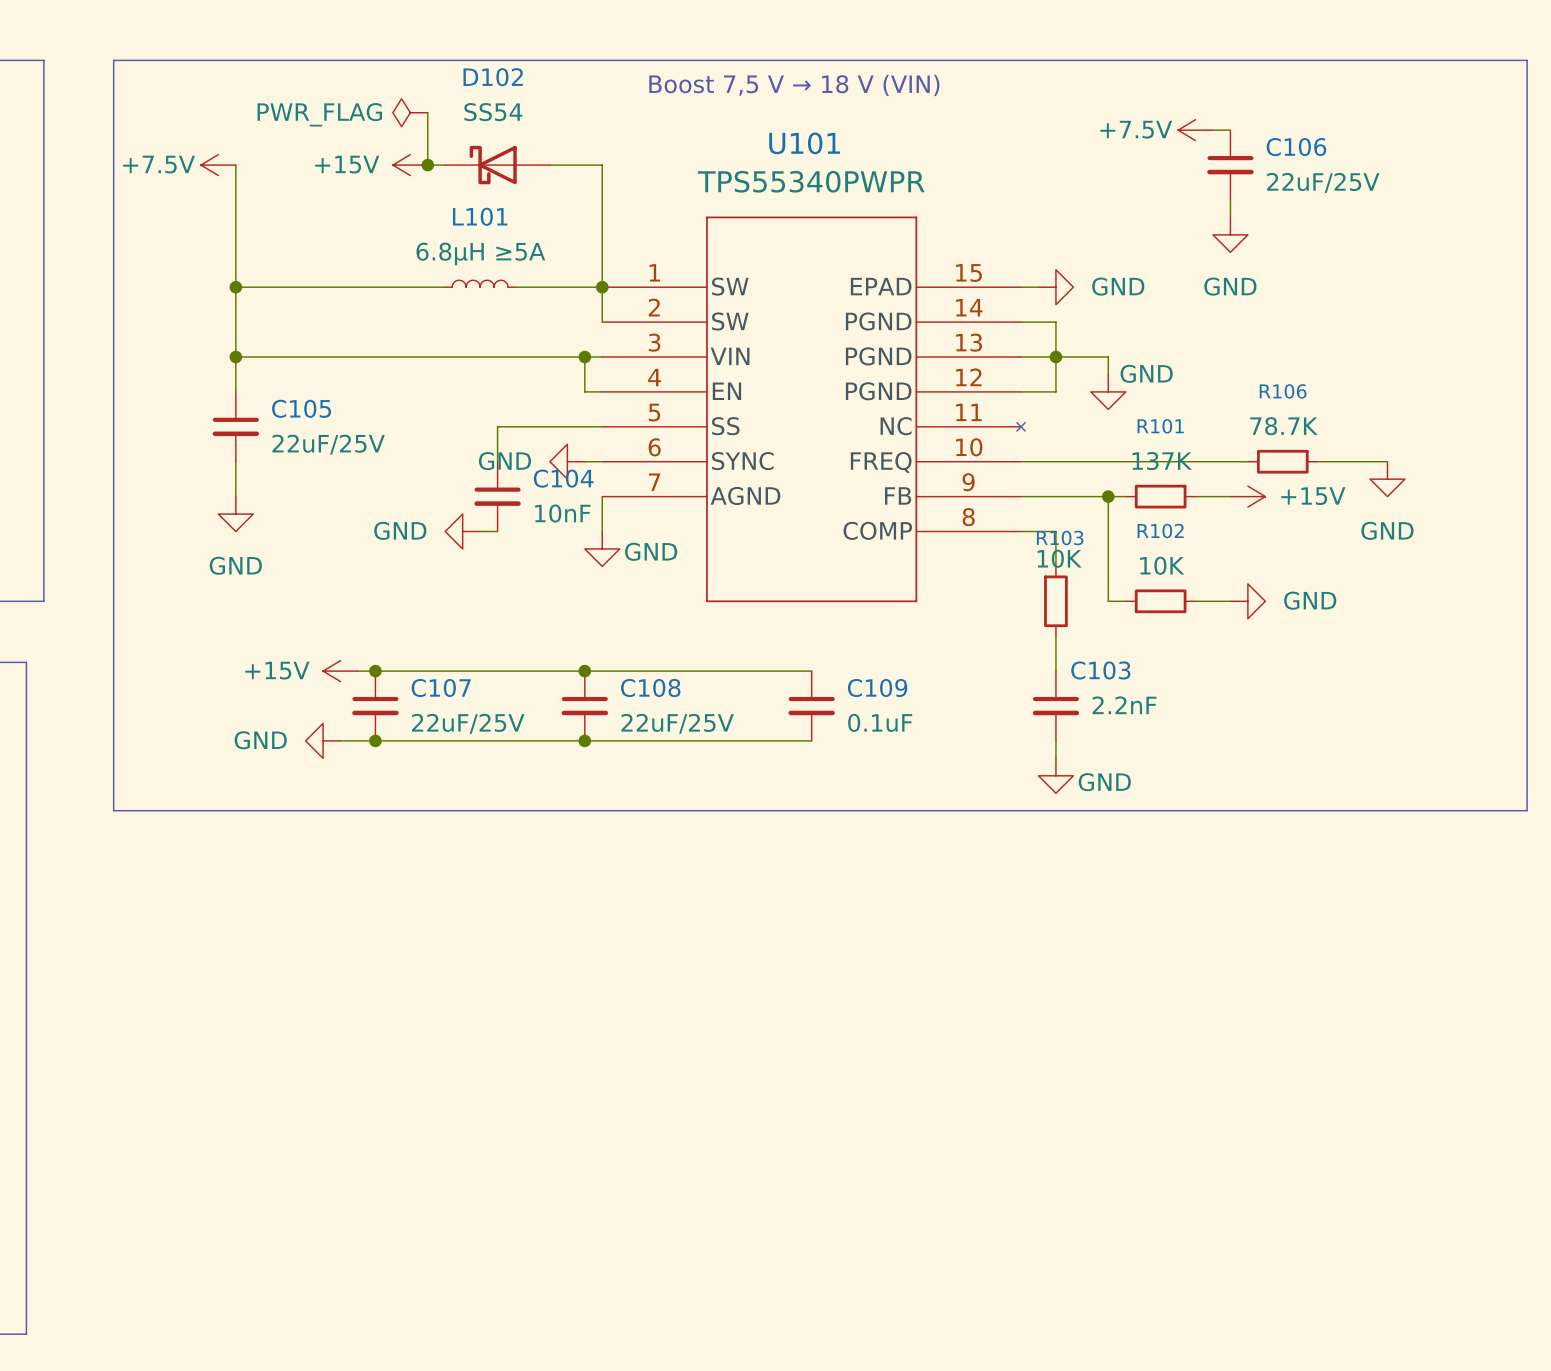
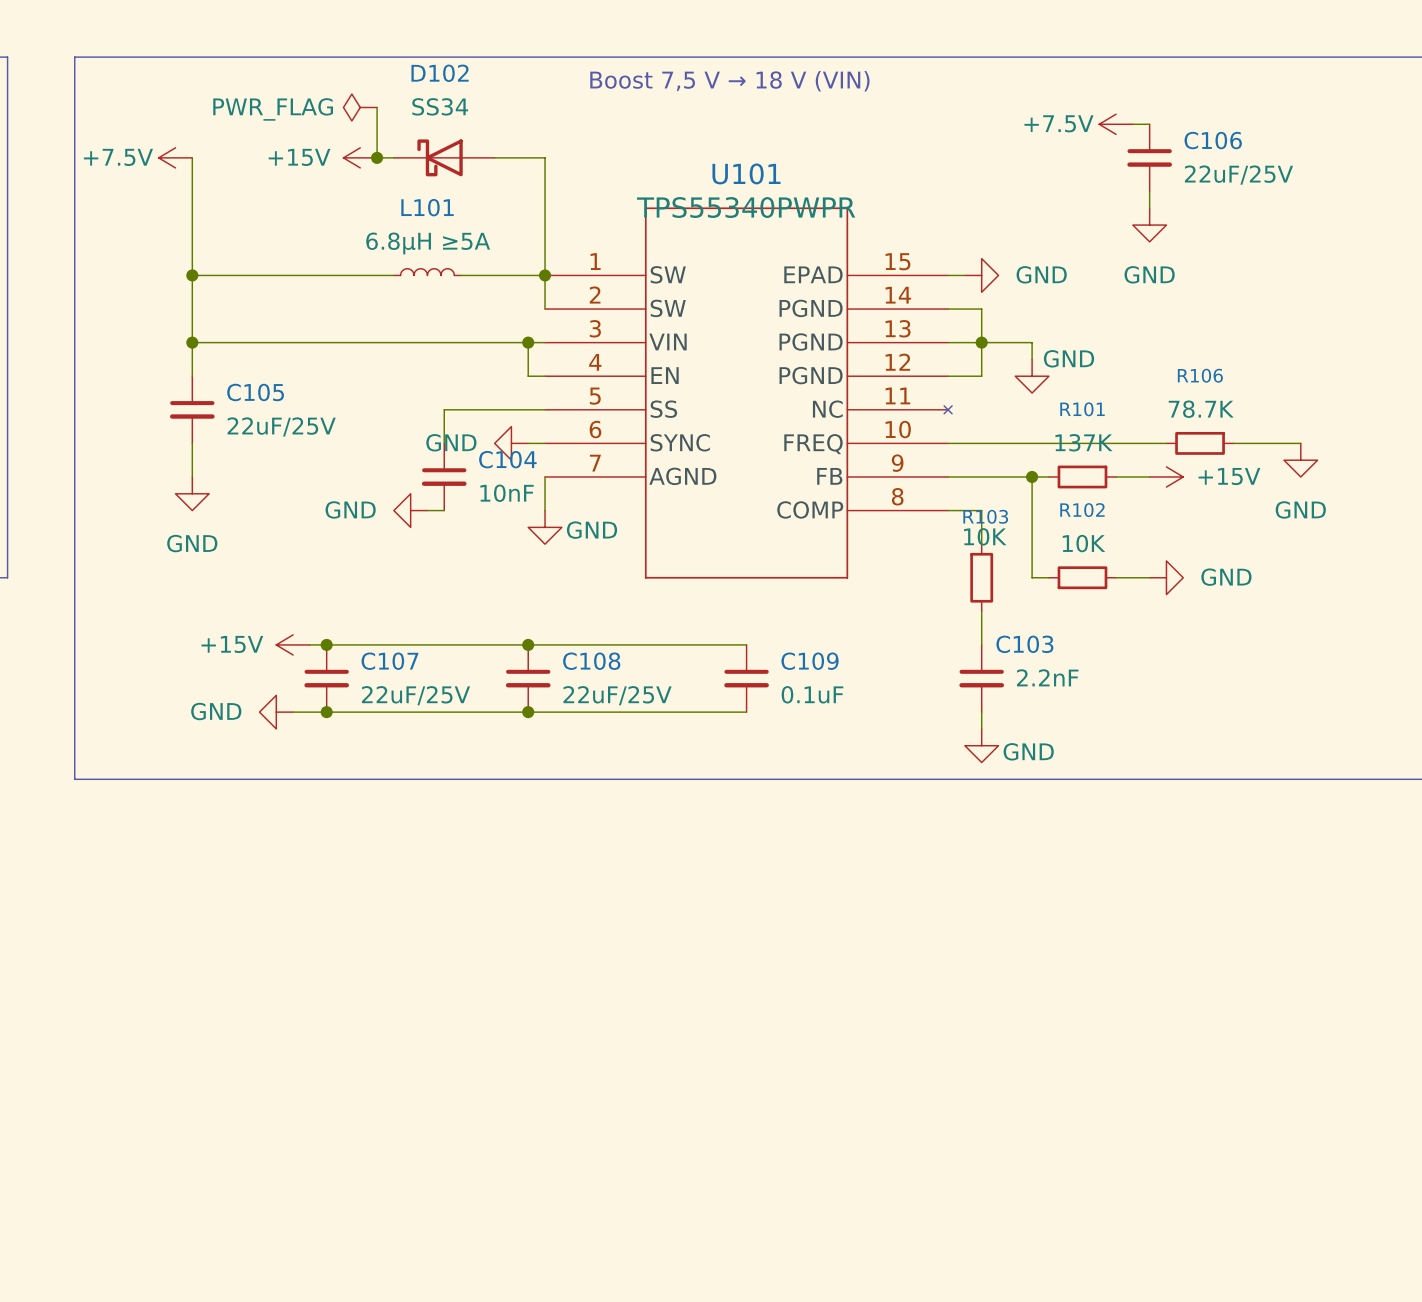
D102 value: SS54 (493, 112) -> SS34 (440, 106)
U101 name position: U101 (804, 143) -> U101 (746, 173)
U101 value position: TPS55340PWPR (811, 181) -> TPS55340PWPR (746, 207)

